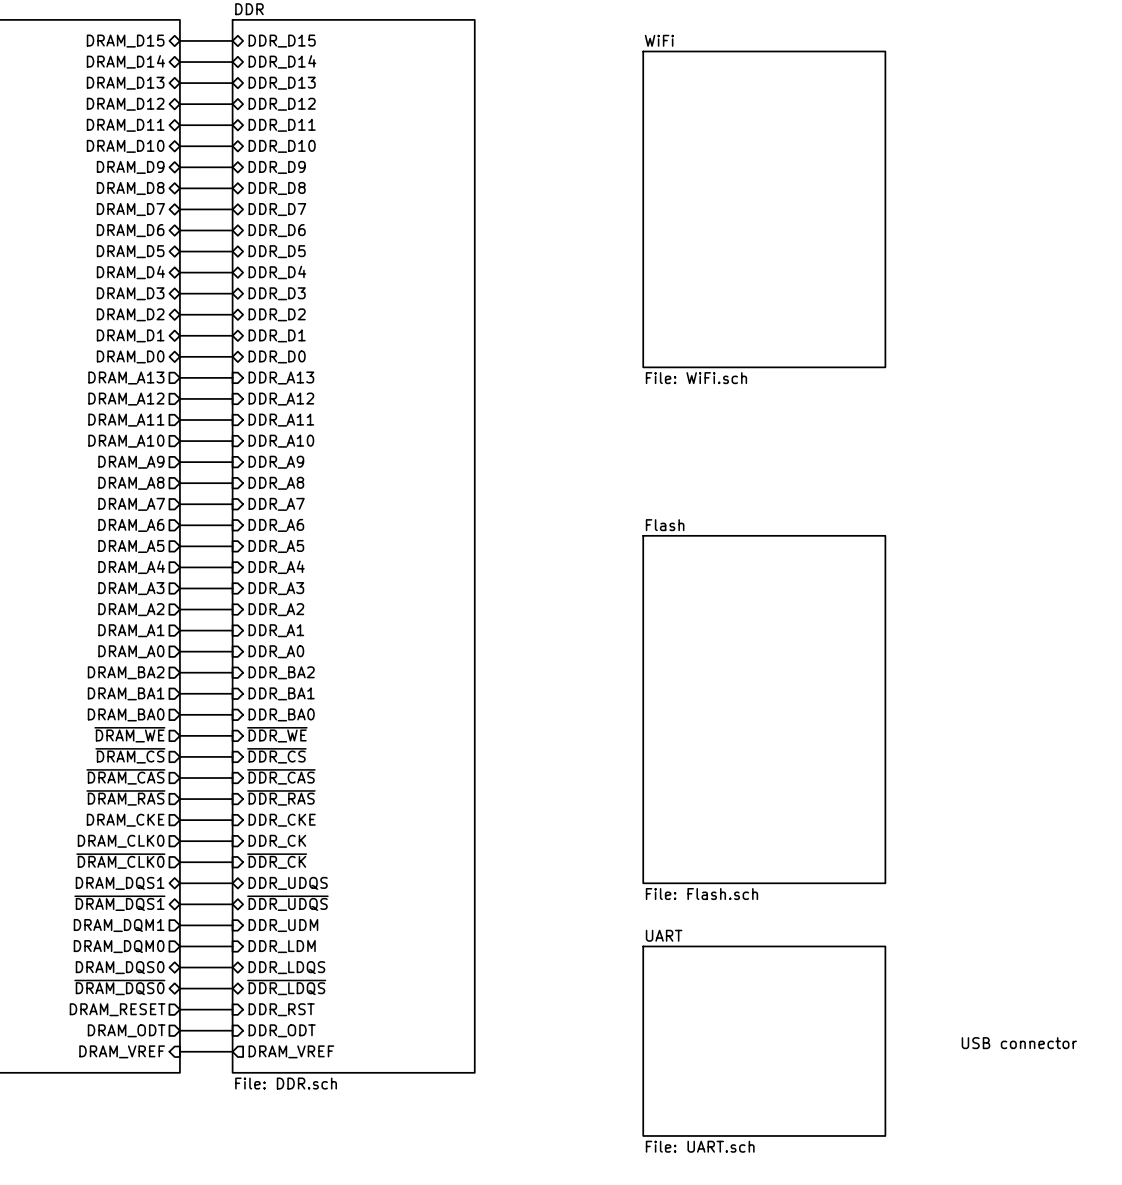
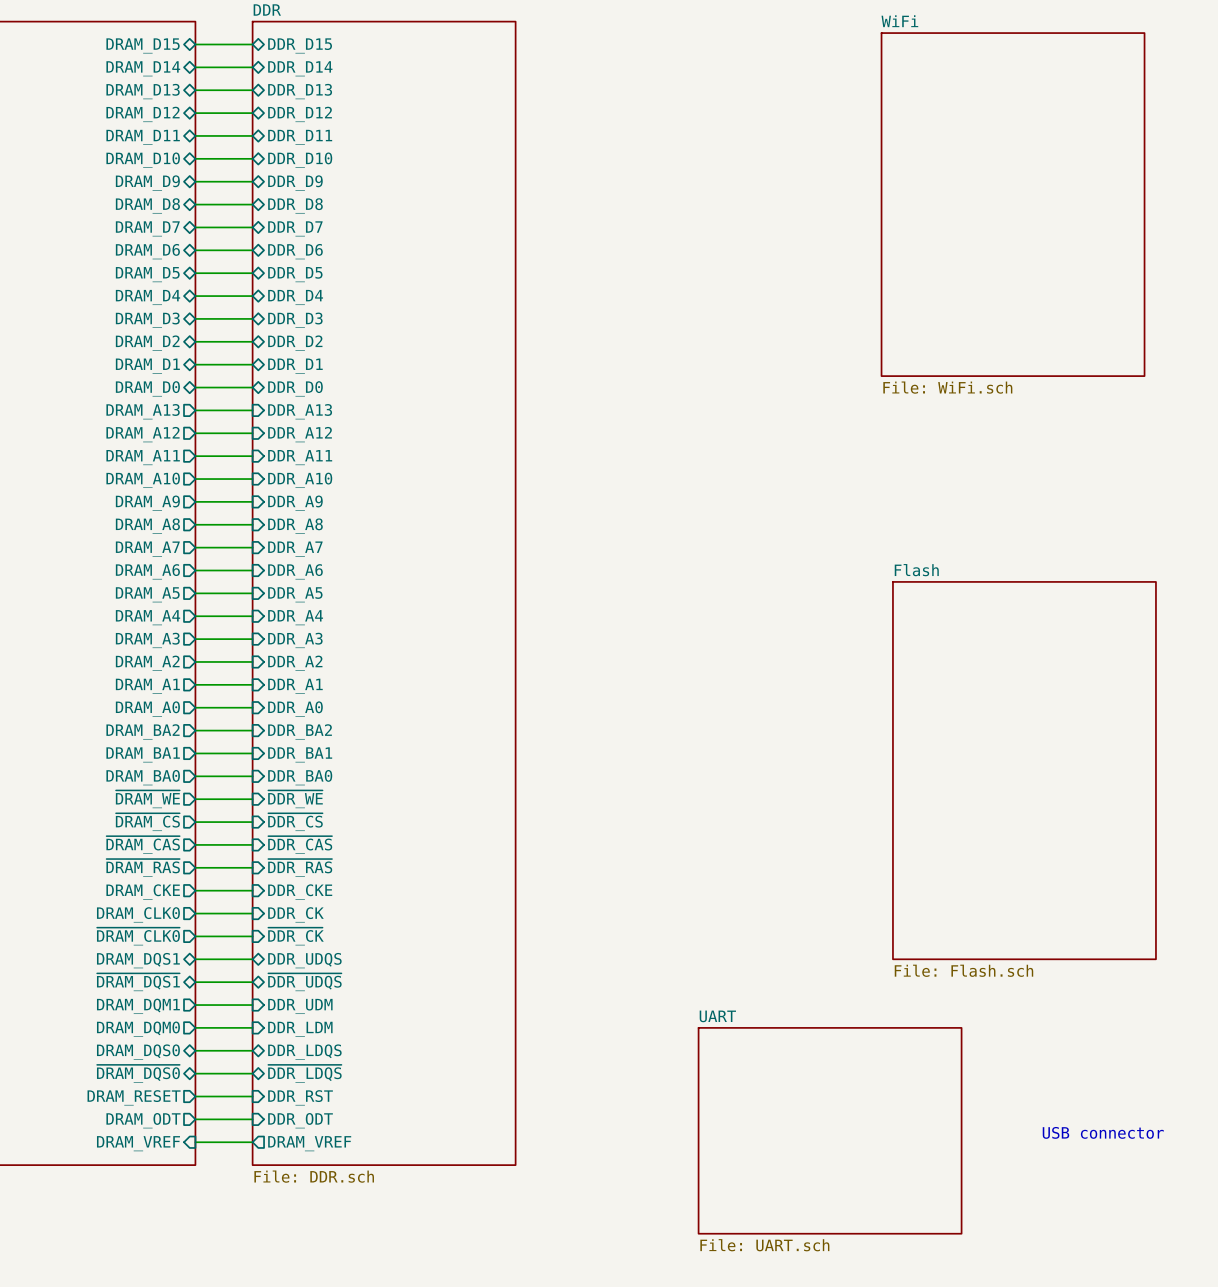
sheet WiFi position: (764, 209) -> (1013, 204)
sheet Flash position: (764, 709) -> (1024, 770)

